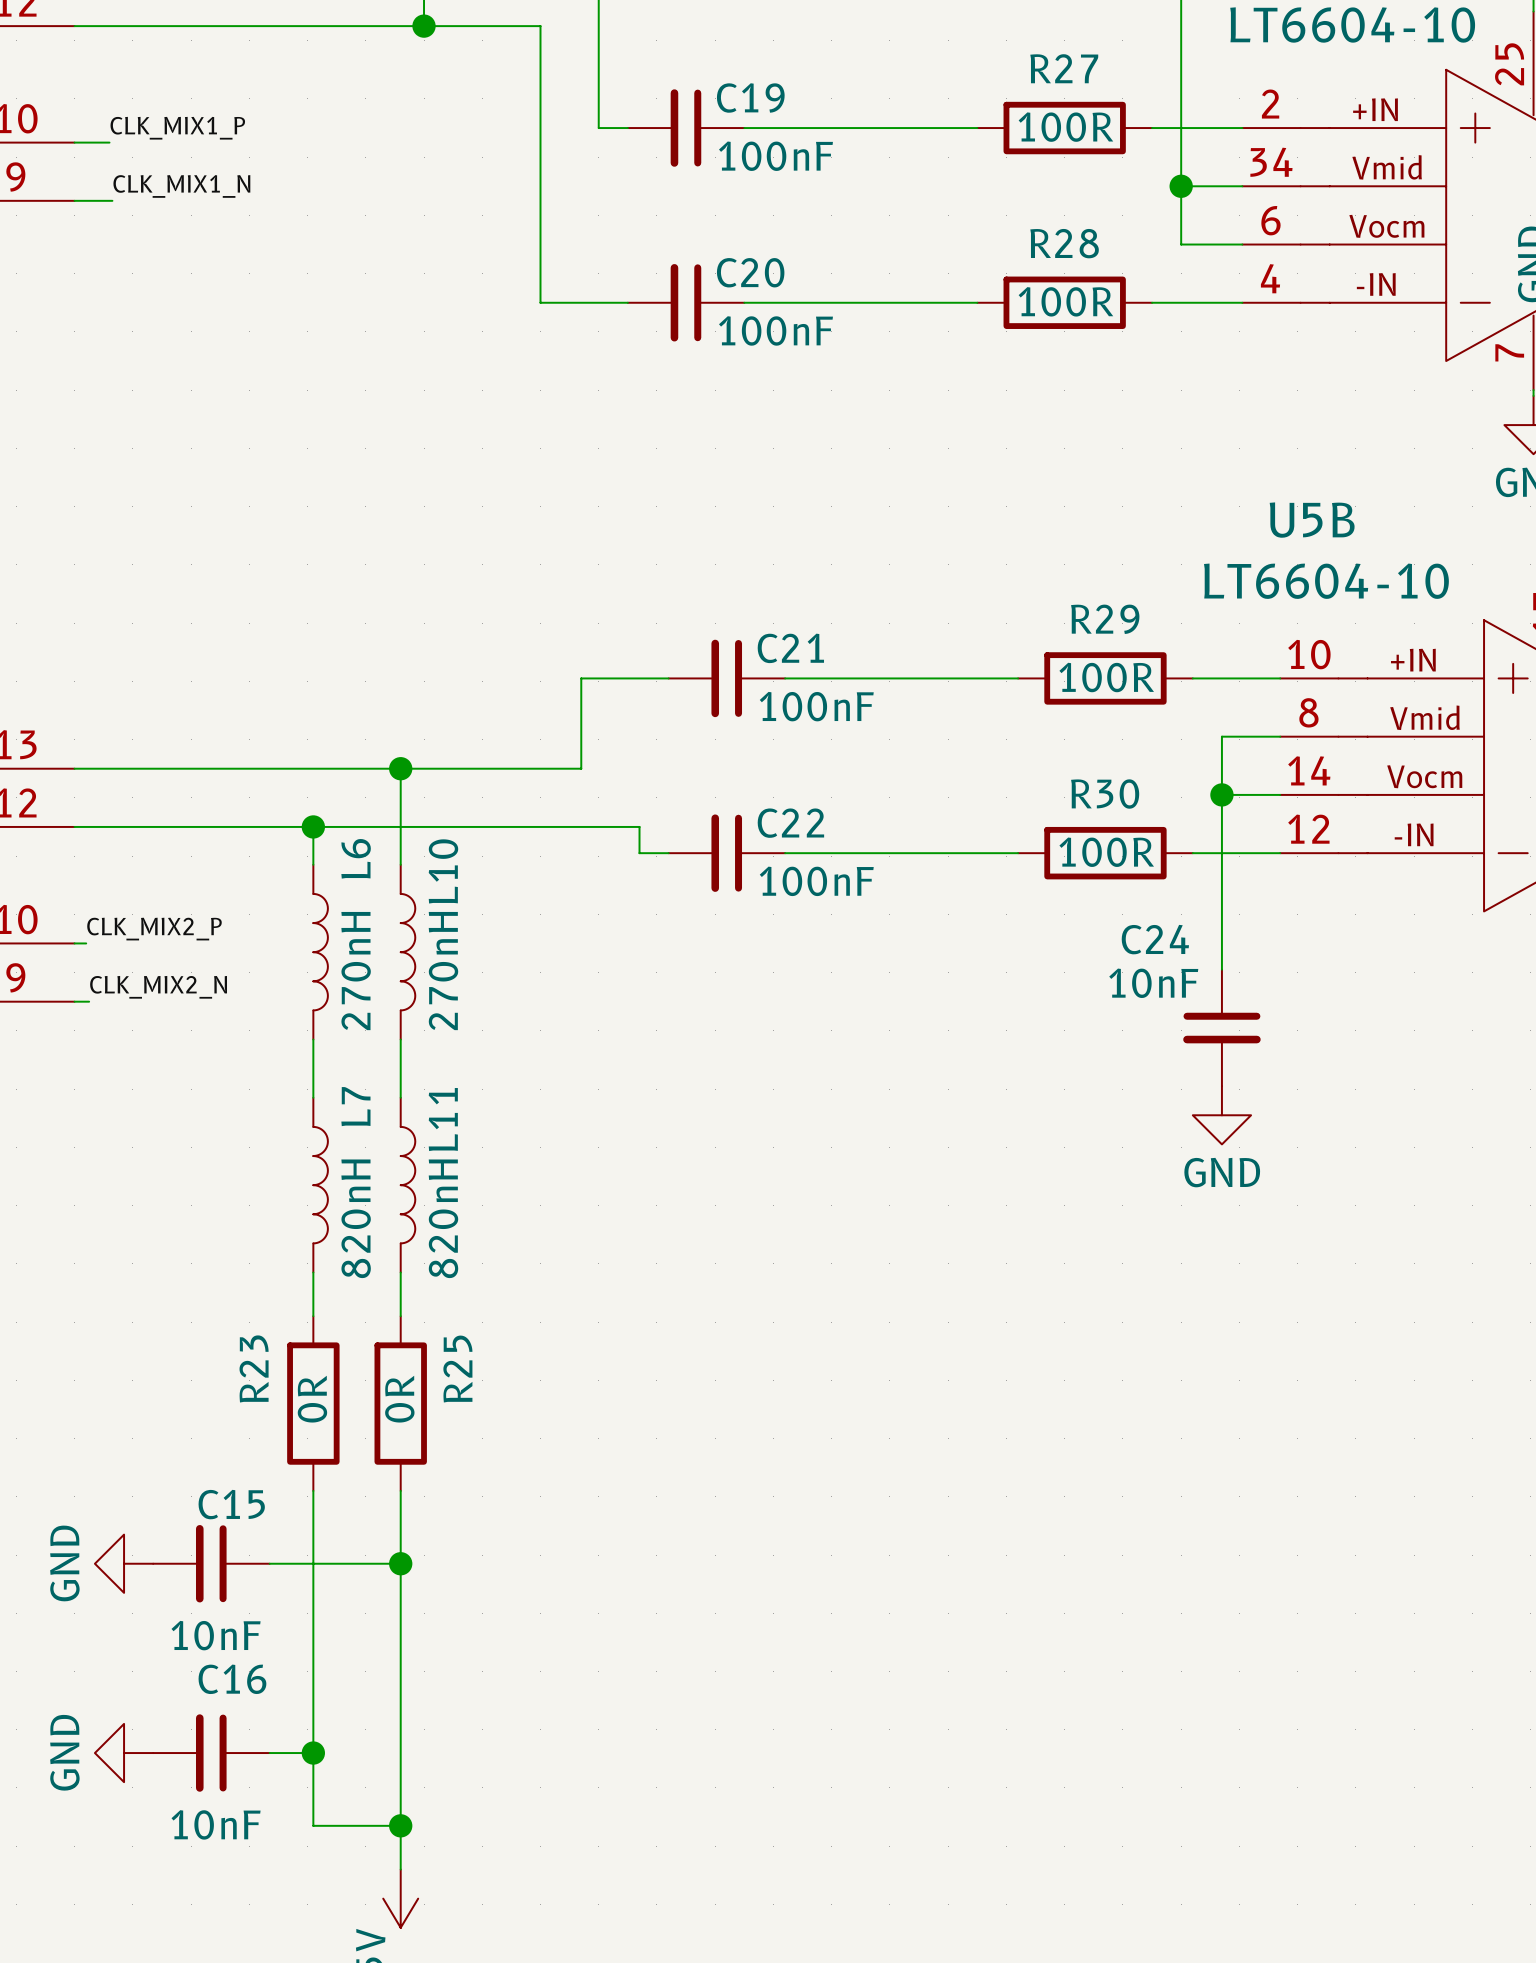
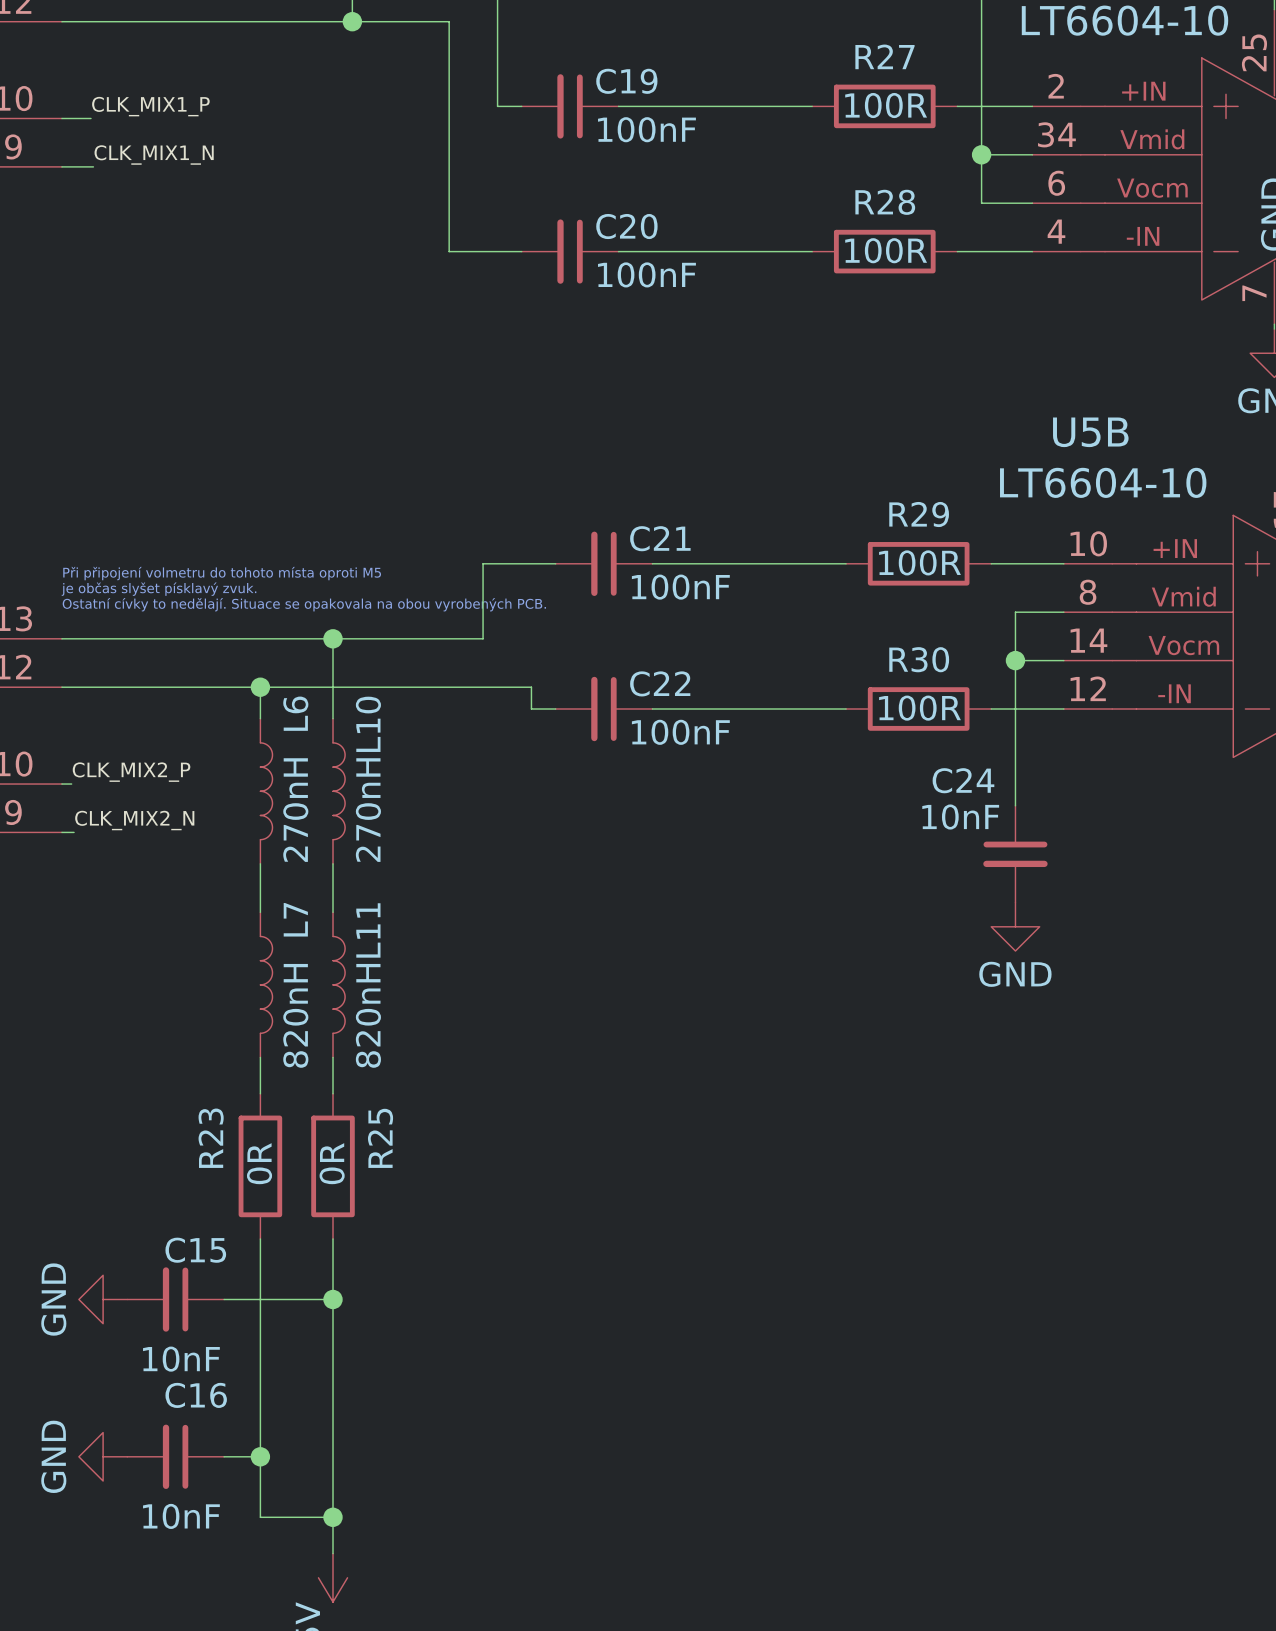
text: none -> Při připojení volmetru do tohoto místa oproti M5 (222, 573)
text: none -> je občas slyšet písklavý zvuk. (159, 589)
text: none -> Ostatní cívky to nedělají. Situace se opakovala na obou vyrobených PCB. (304, 604)

